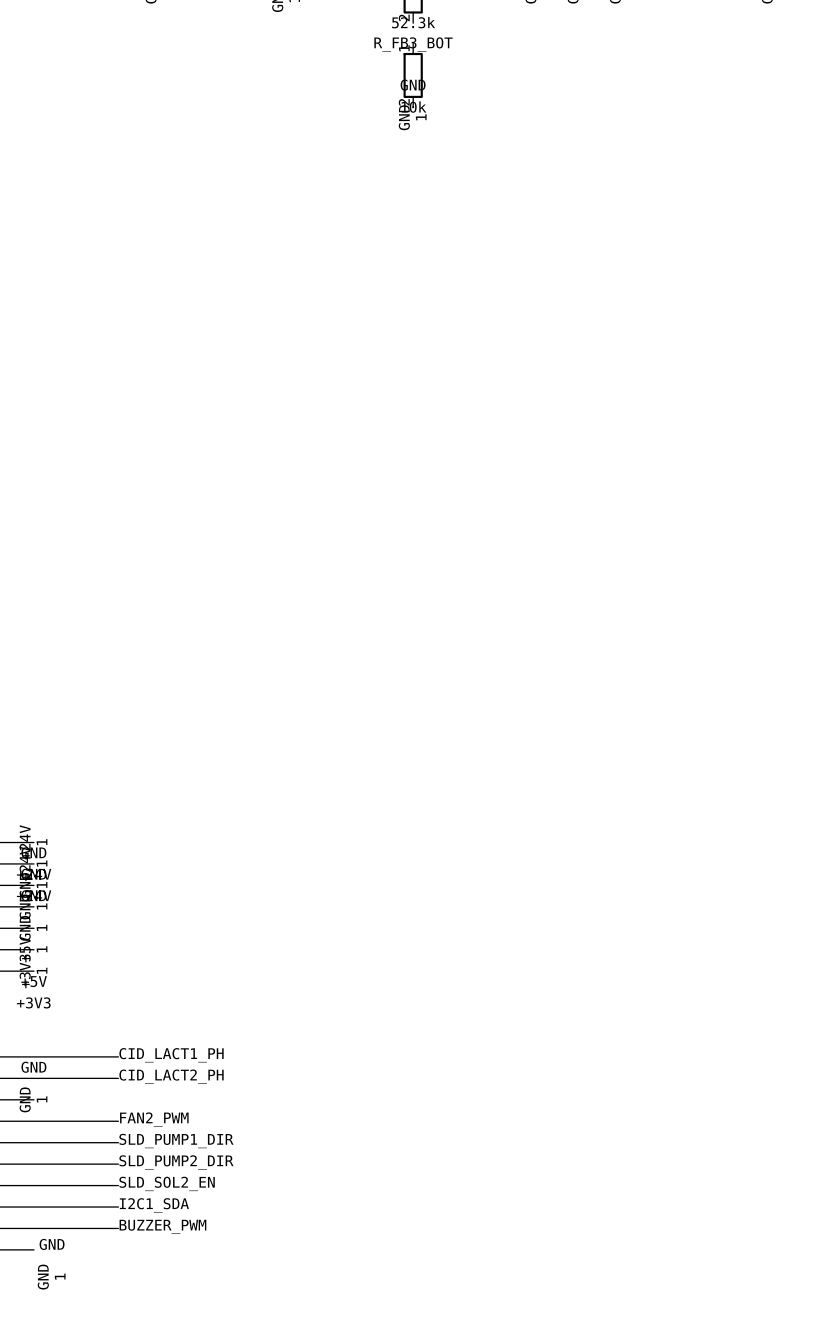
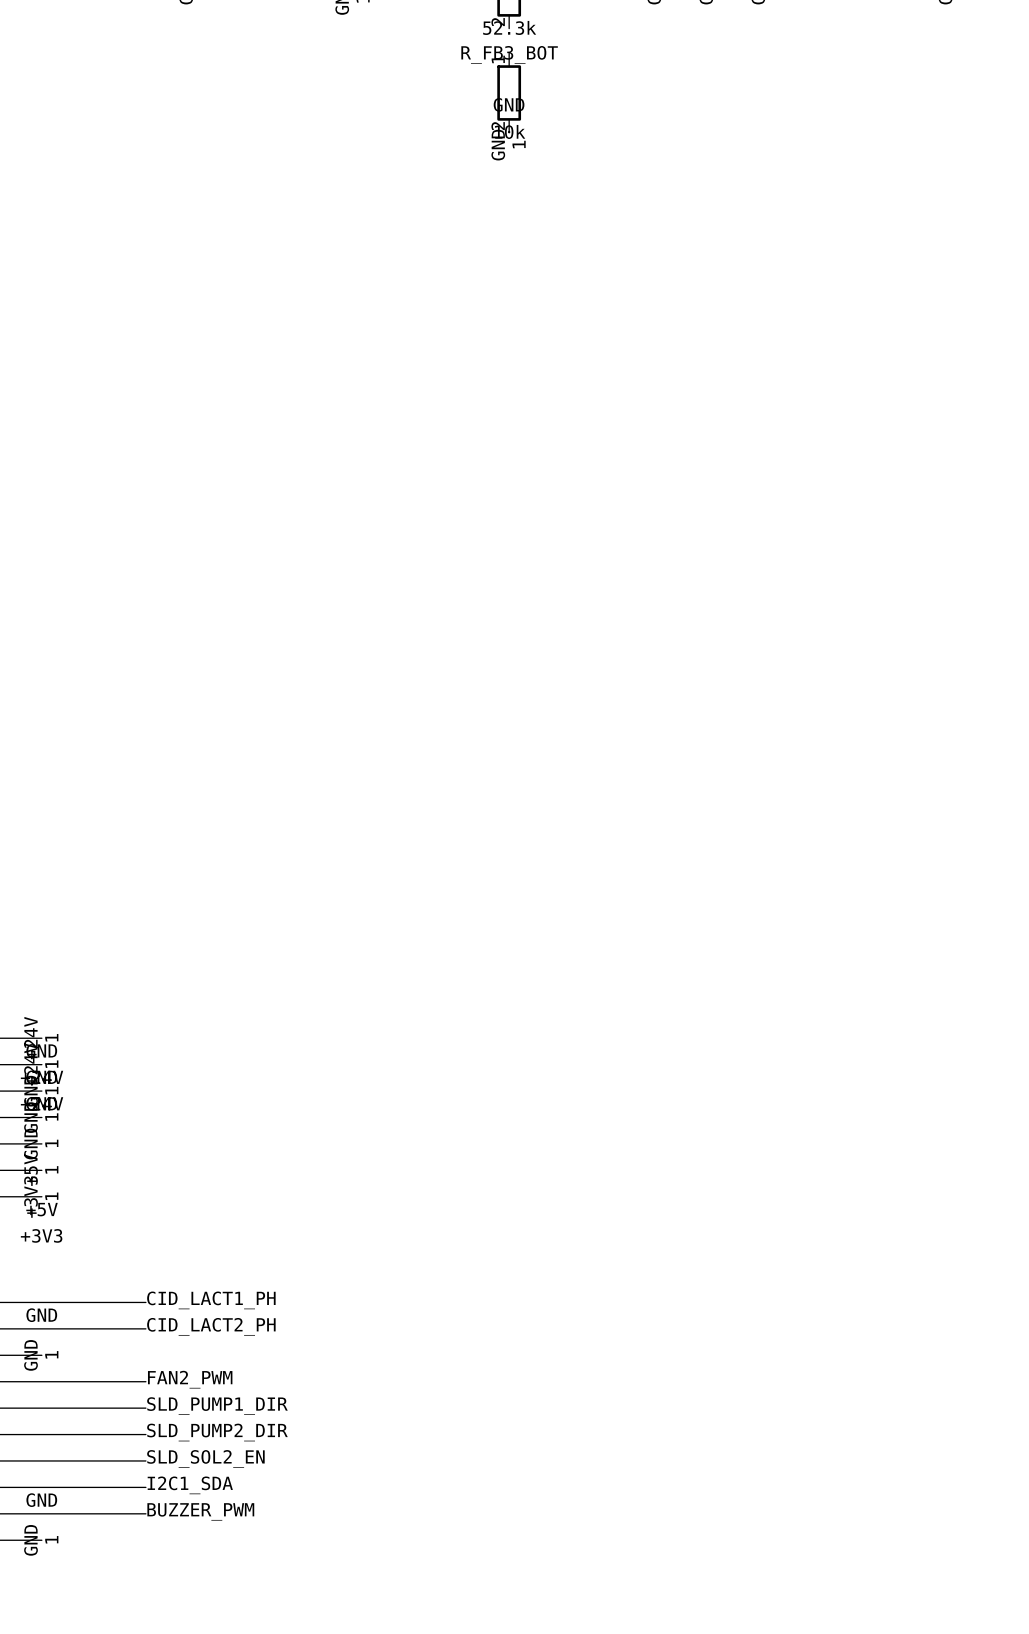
power symbol position: GND (51, 1264) -> GND (41, 1524)

